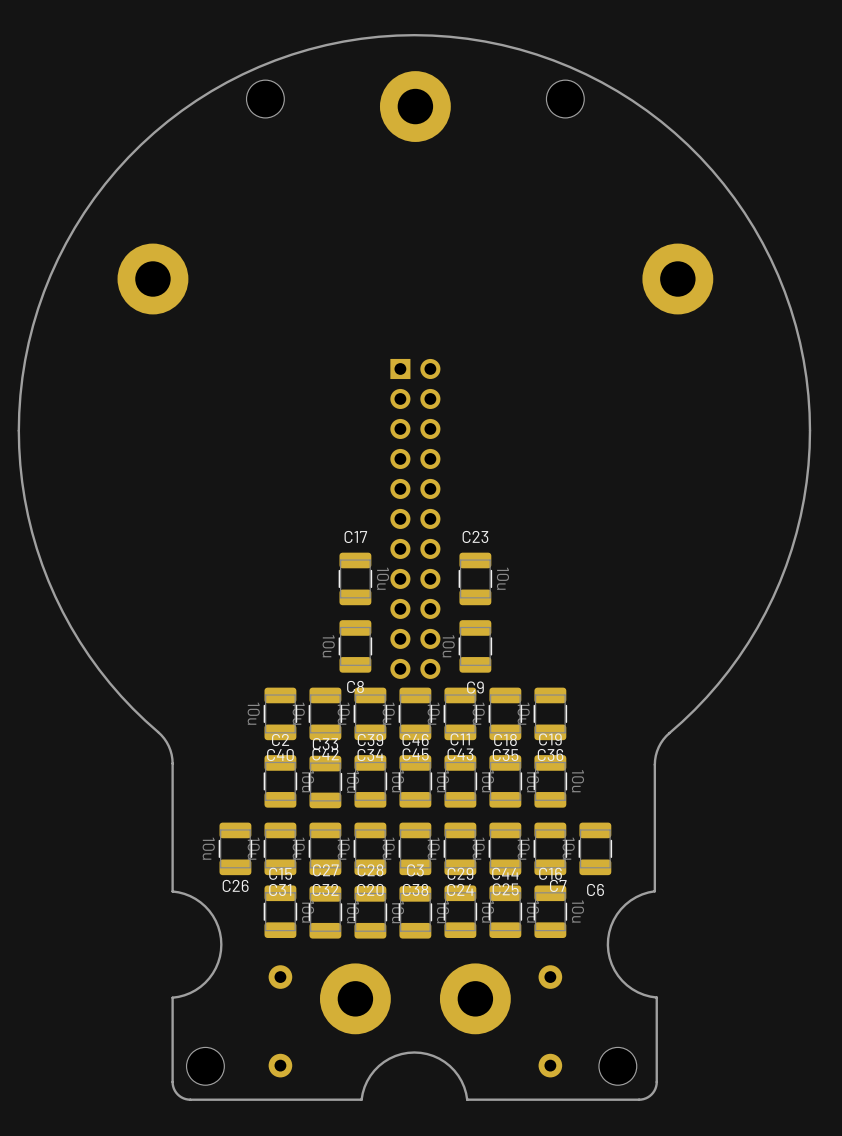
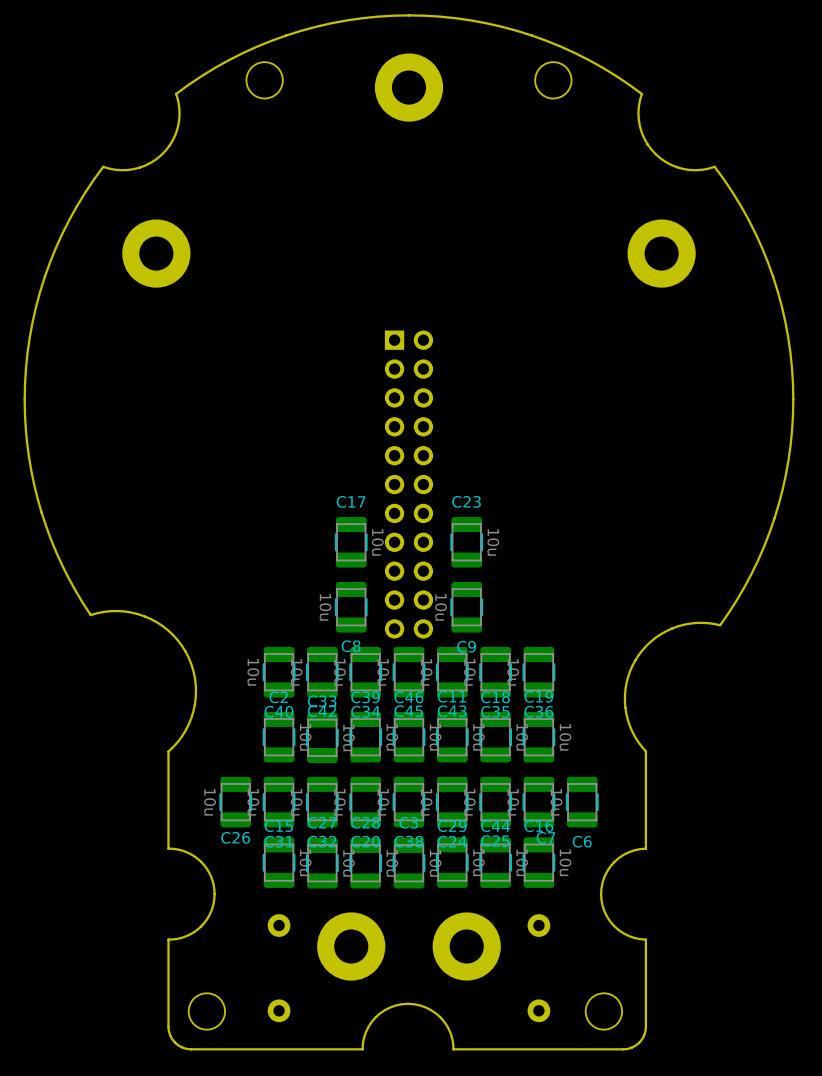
board edge: (809, 430) (804, 499) (791, 549) (780, 581) (757, 627) (728, 670) (694, 709) (666, 736) (658, 747) (654, 764) (654, 891) (636, 897) (625, 904) (617, 914) (609, 932) (607, 945) (609, 958) (618, 975) (627, 985) (637, 992) (656, 997) (656, 1082) (651, 1094) (639, 1099) (467, 1099) (461, 1081) (449, 1066) (433, 1055) (414, 1052) (395, 1055) (378, 1066) (367, 1081) (361, 1099) (190, 1099) (177, 1094) (172, 1082) (172, 997) (190, 993) (209, 978) (219, 956) (219, 932) (212, 915) (200, 902) (184, 893) (172, 891) (172, 763) (170, 750) (161, 735) (132, 708) (99, 669) (62, 612) (48, 581) (32, 532) (24, 498) (19, 447) (20, 395) (25, 360) (33, 325) (44, 291) (58, 259) (84, 212) (105, 184) (128, 157) (167, 121) (211, 91) (258, 67) (292, 54) (326, 45) (361, 38) (396, 35) (449, 36) (502, 45) (553, 60) (601, 82) (646, 110) (674, 132) (700, 157) (734, 198) (753, 227) (770, 259) (790, 308) (800, 342) (806, 377) (809, 430) -> (409, 15) (455, 18) (486, 23) (531, 35) (575, 53) (602, 67) (641, 93) (638, 113) (639, 126) (647, 144) (660, 158) (671, 164) (689, 169) (714, 166) (740, 205) (755, 233) (767, 262) (781, 306) (788, 337) (792, 384) (792, 429) (785, 474) (774, 518) (758, 560) (736, 600) (720, 625) (689, 623) (660, 634) (642, 650) (628, 677) (624, 695) (627, 719) (634, 736) (645, 751) (645, 848) (628, 852) (614, 862) (604, 876) (601, 894) (604, 911) (614, 926) (628, 935) (645, 939) (645, 1028) (639, 1042) (631, 1047) (623, 1049) (453, 1049) (450, 1031) (440, 1017) (425, 1007) (408, 1003) (390, 1007) (375, 1017) (366, 1031) (362, 1049) (186, 1048) (175, 1042) (168, 1031) (168, 939) (190, 934) (204, 923) (212, 907) (214, 889) (209, 872) (197, 858) (181, 850) (168, 848) (168, 751) (182, 736) (191, 717) (195, 697) (194, 677) (188, 657) (181, 645) (168, 630) (156, 622) (144, 616) (124, 611) (104, 611) (90, 615) (62, 565) (41, 512) (34, 484) (27, 442) (25, 384) (32, 322) (50, 262) (69, 219) (85, 192) (103, 166) (121, 170) (139, 167) (151, 162) (165, 150) (173, 138) (178, 125) (179, 111) (176, 93) (228, 60) (286, 35) (346, 20) (409, 15)

